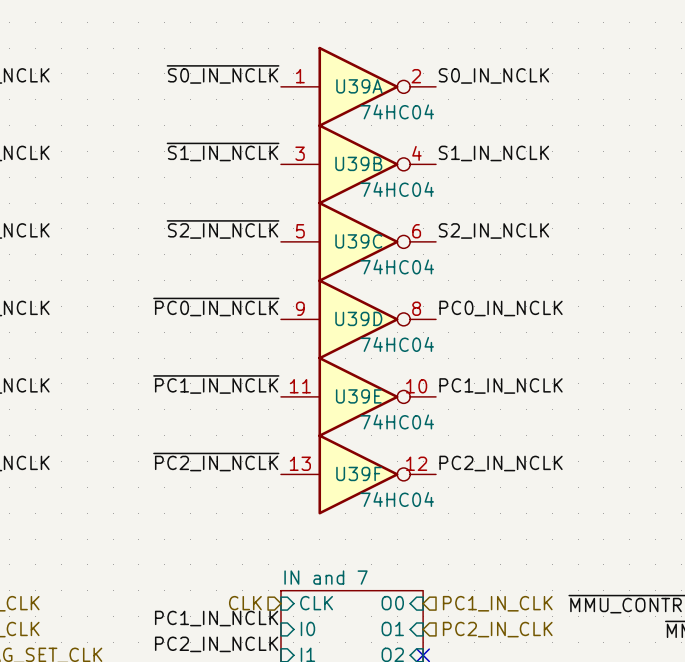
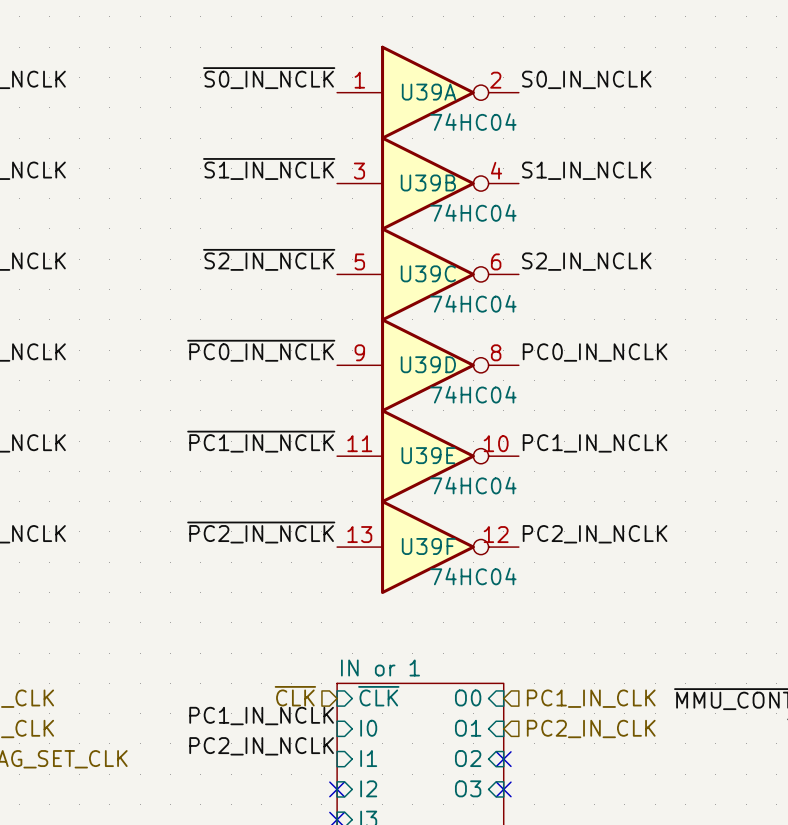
sheet IN and 7 name: IN and 7 (325, 577) -> IN or 1 (380, 667)
hierarchical label: CLK (245, 603) -> ~{CLK} (295, 696)
sheet pin: CLK (316, 603) -> ~{CLK} (378, 696)

